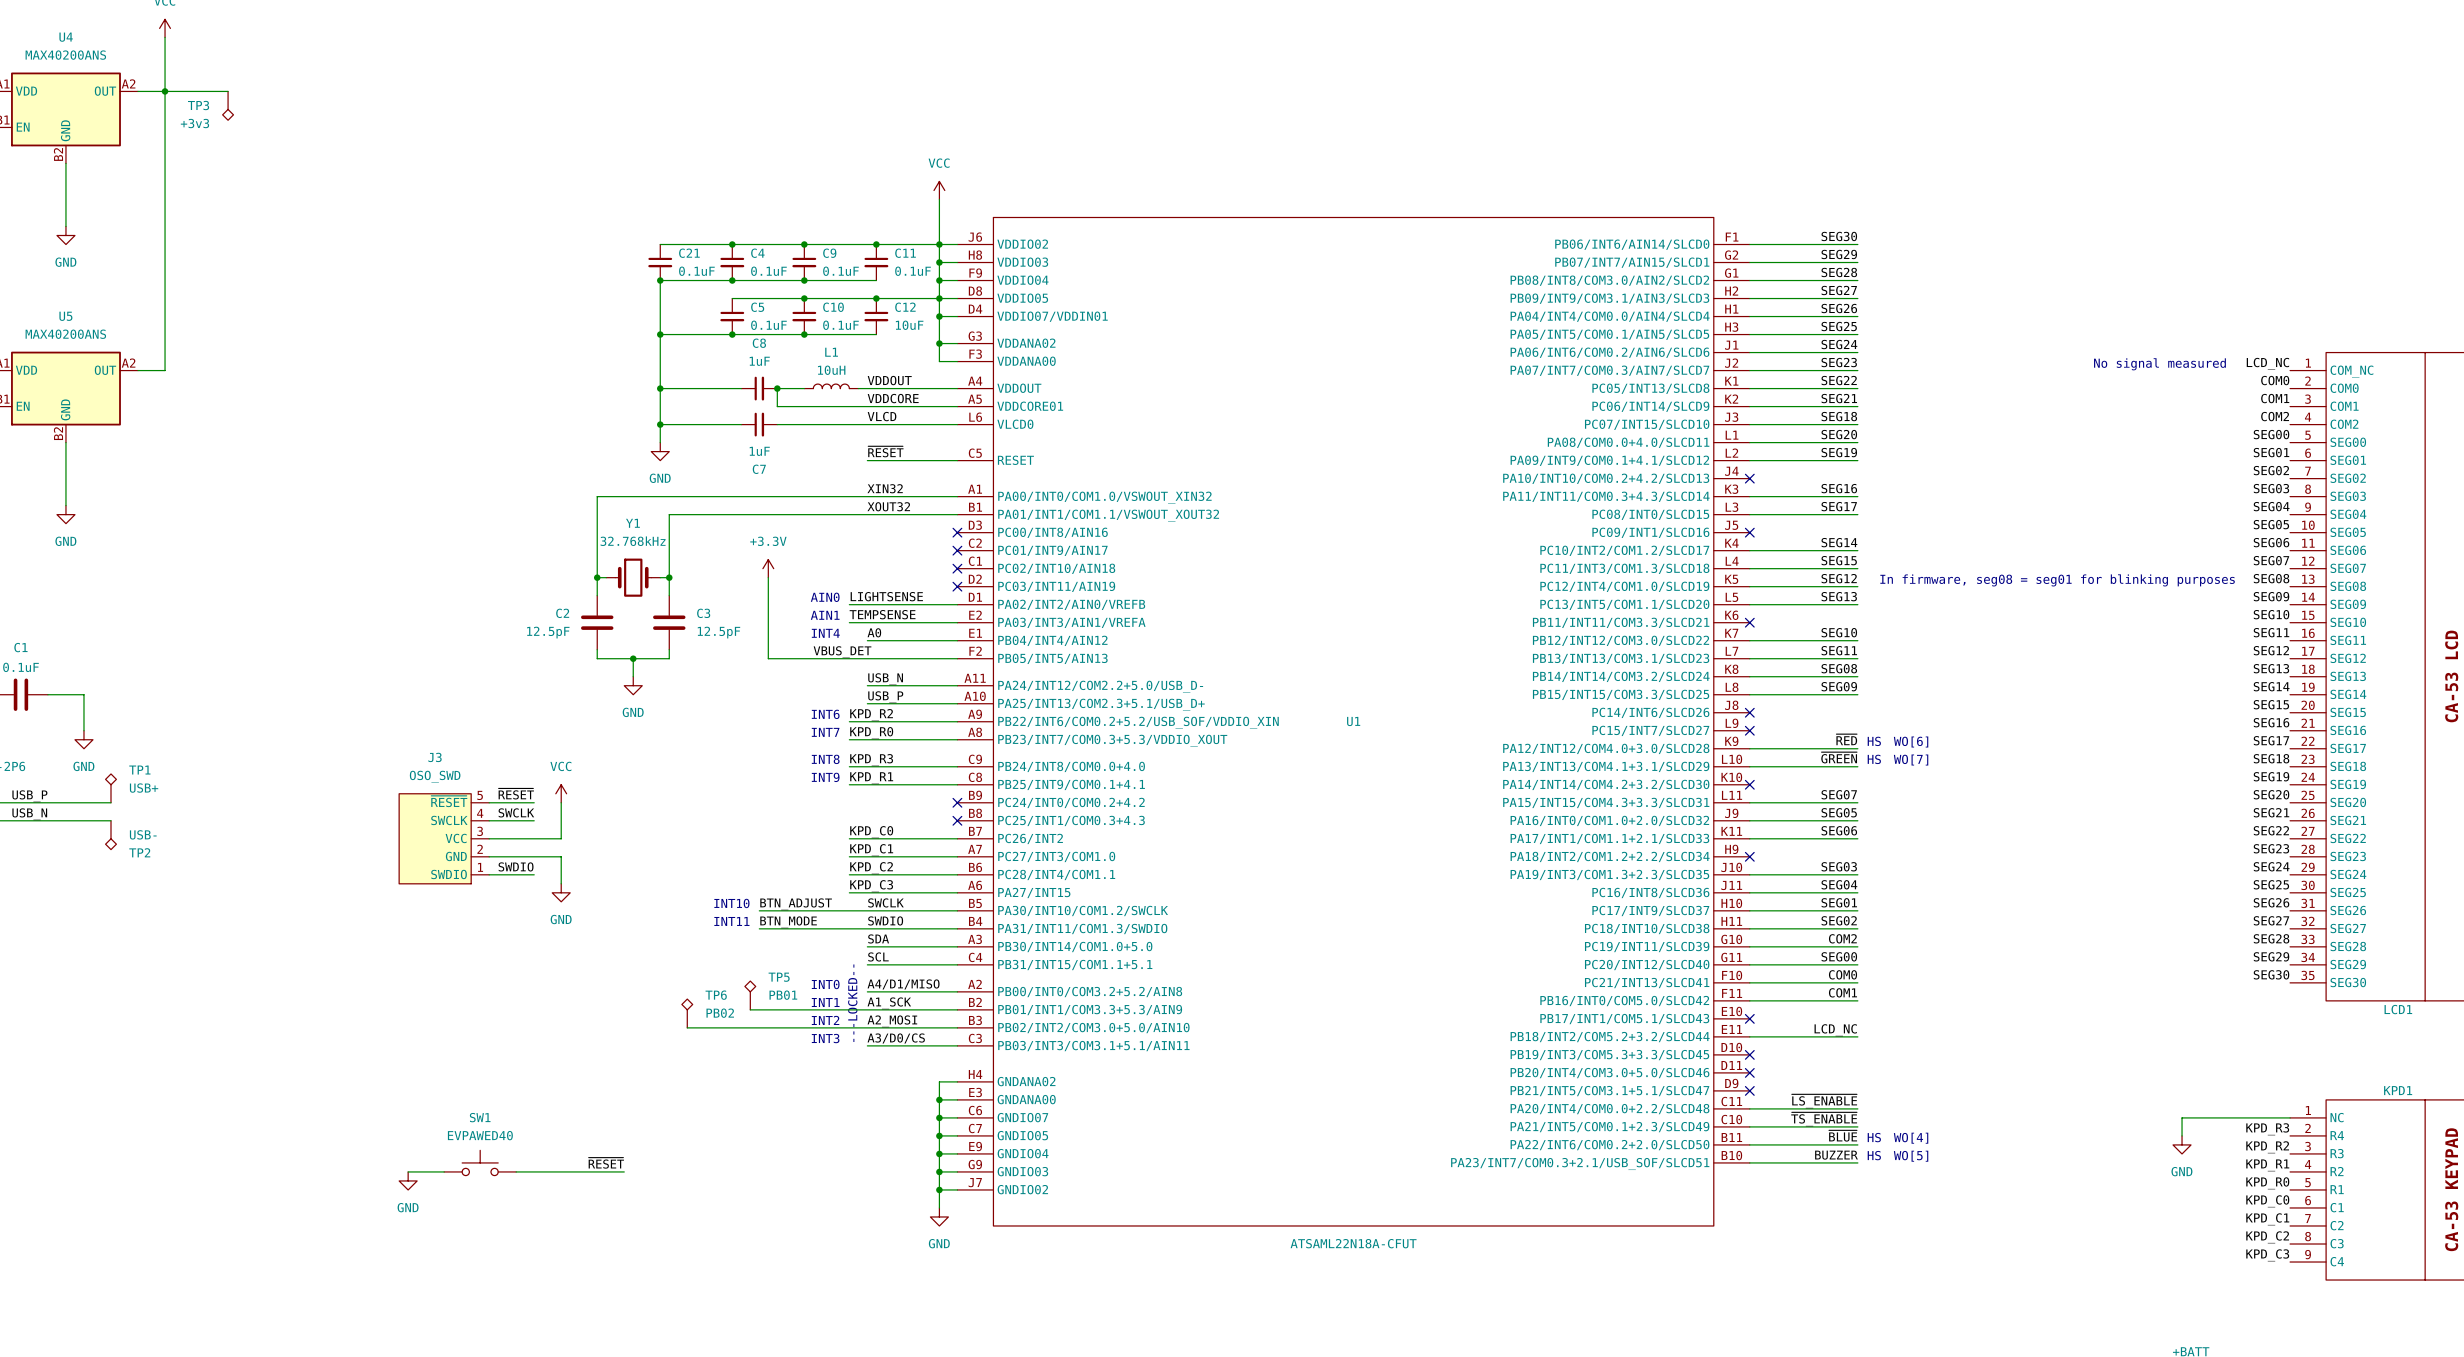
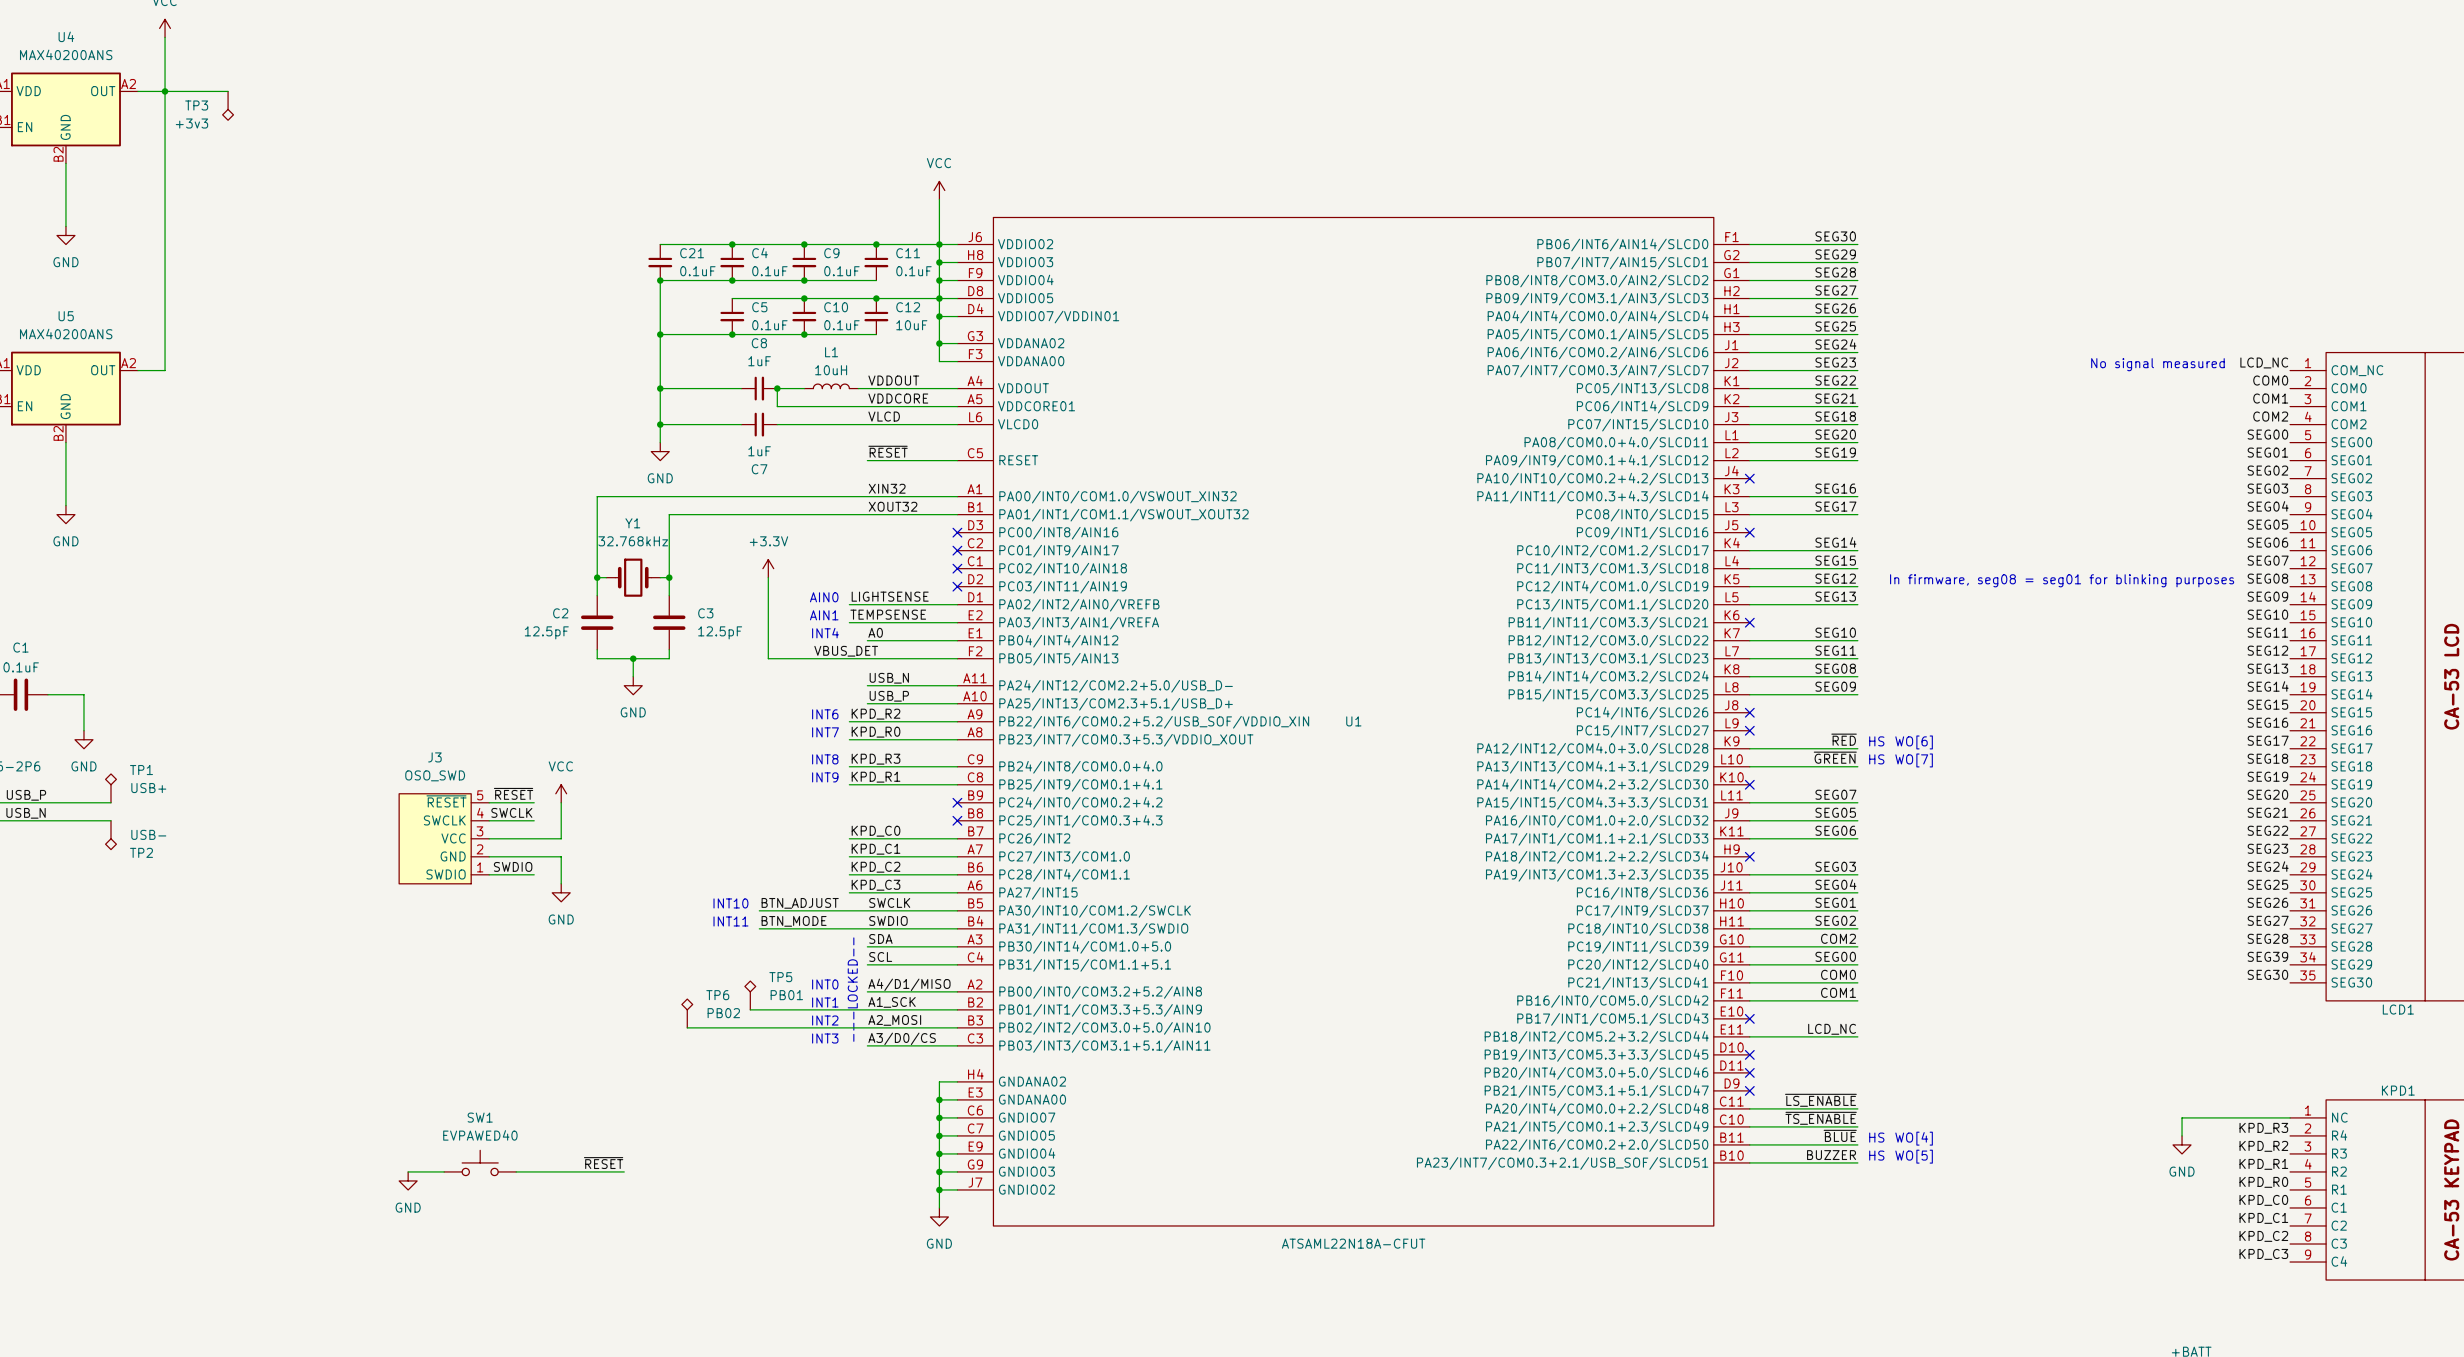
label: SEG29 (2271, 956) -> SEG39 (2267, 956)

